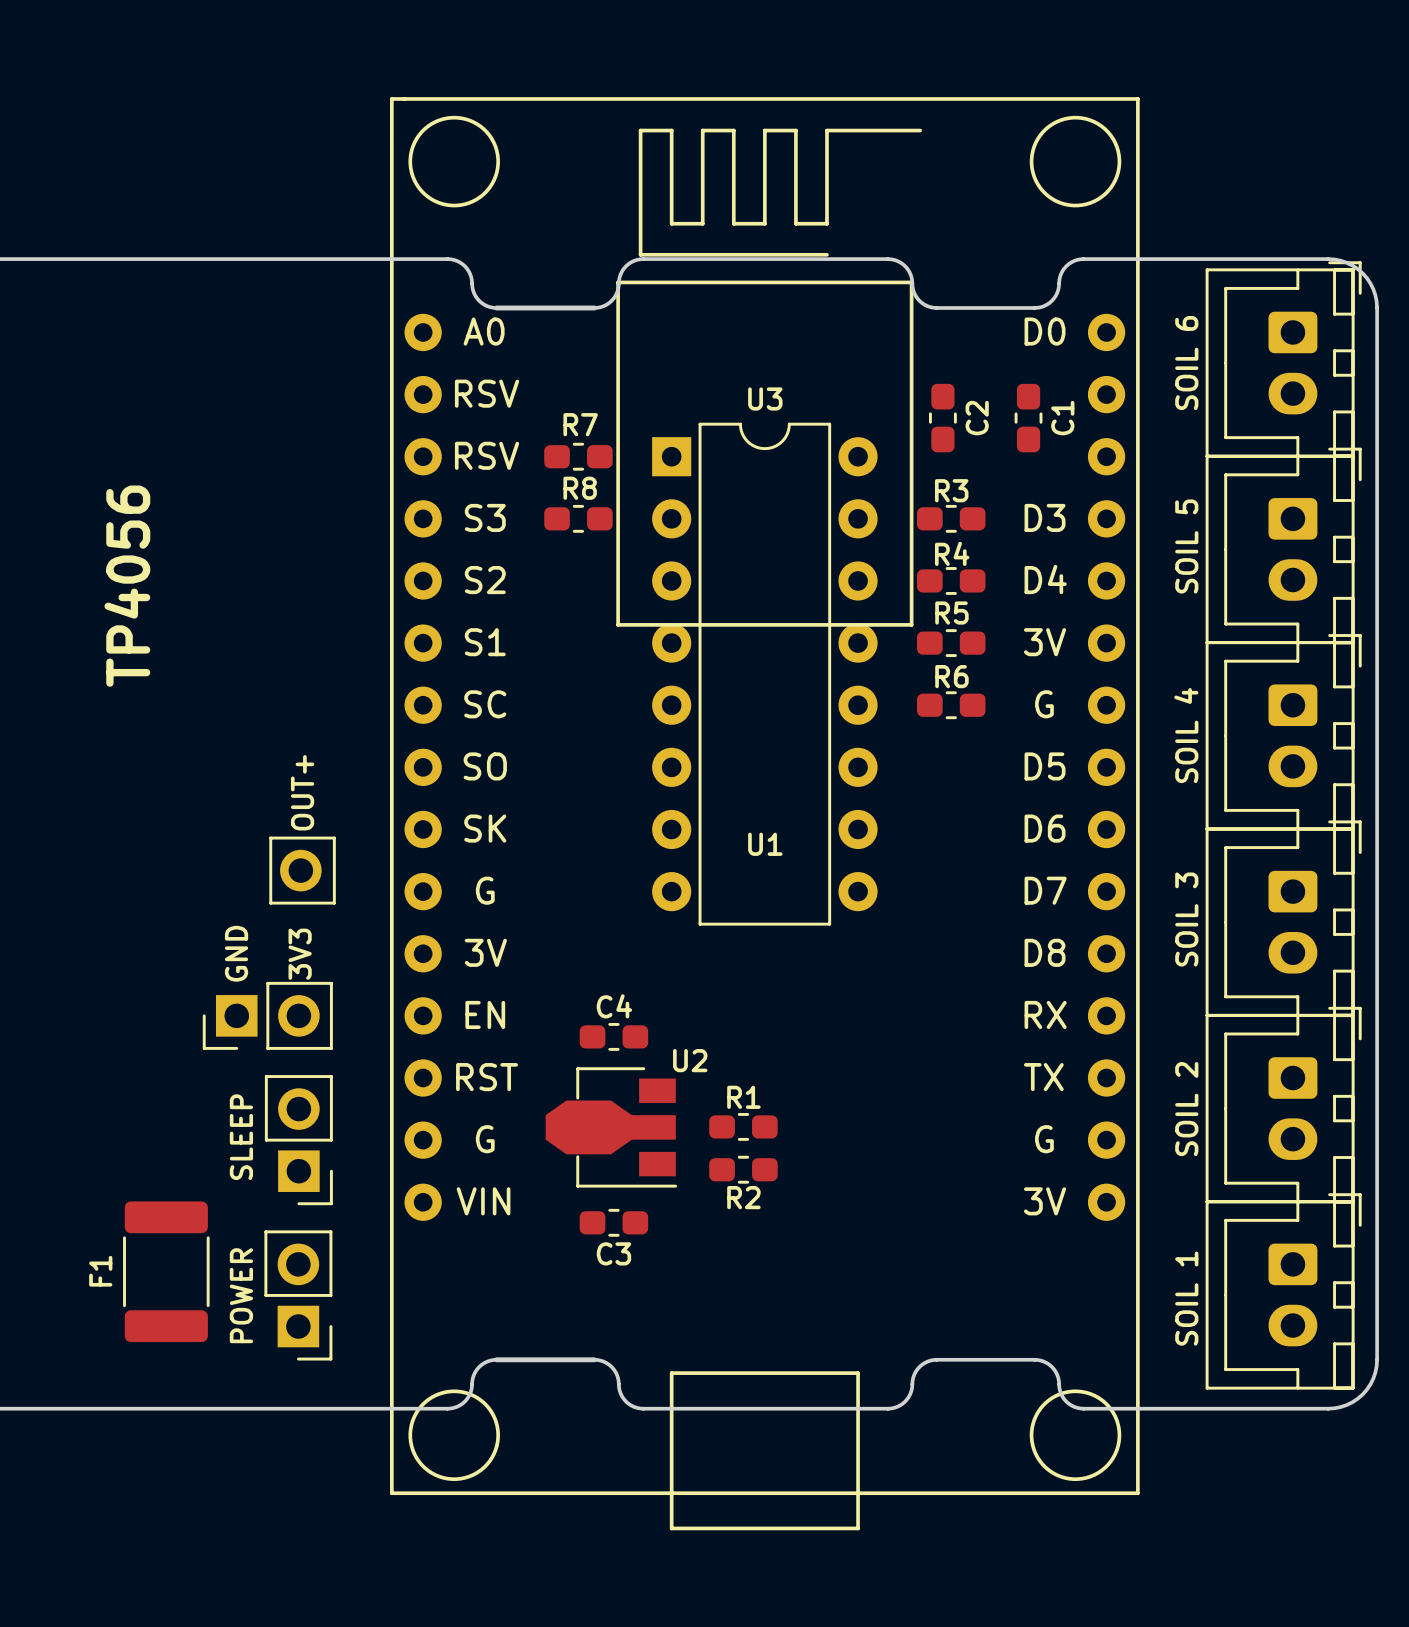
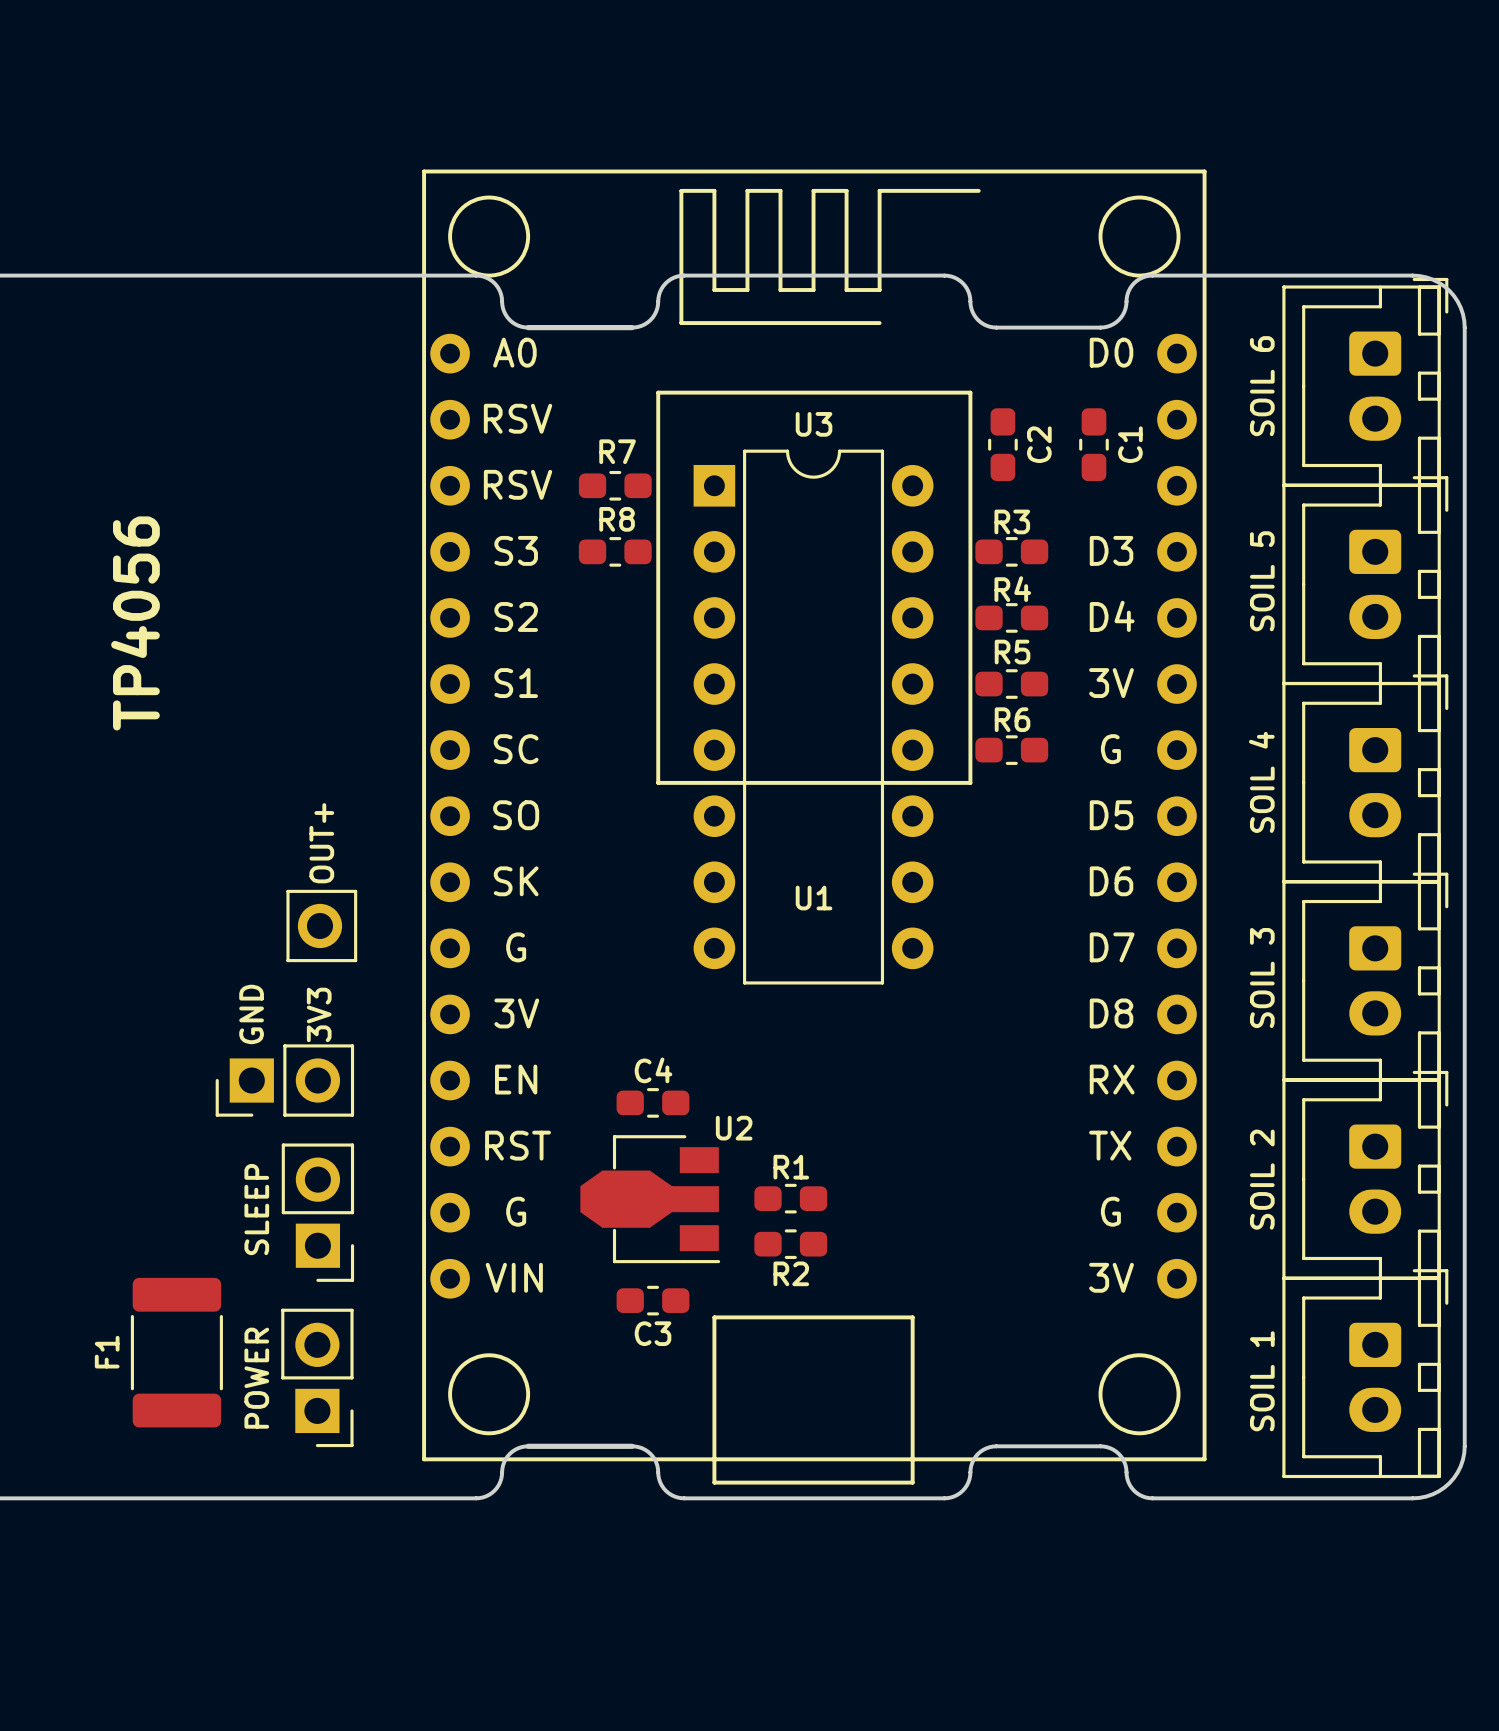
U1 footprint: [390, 97, 1140, 1531] -> [422, 169, 1207, 1485]

